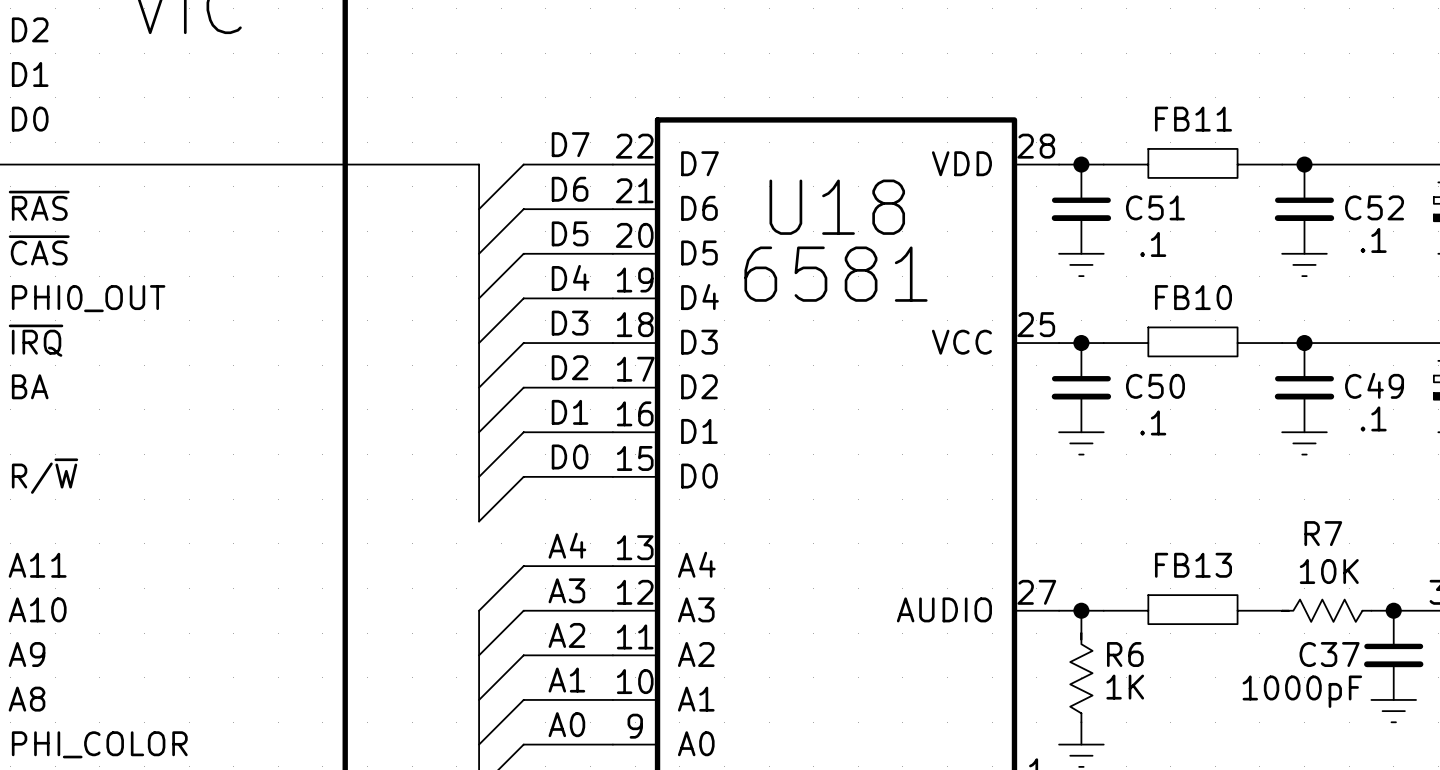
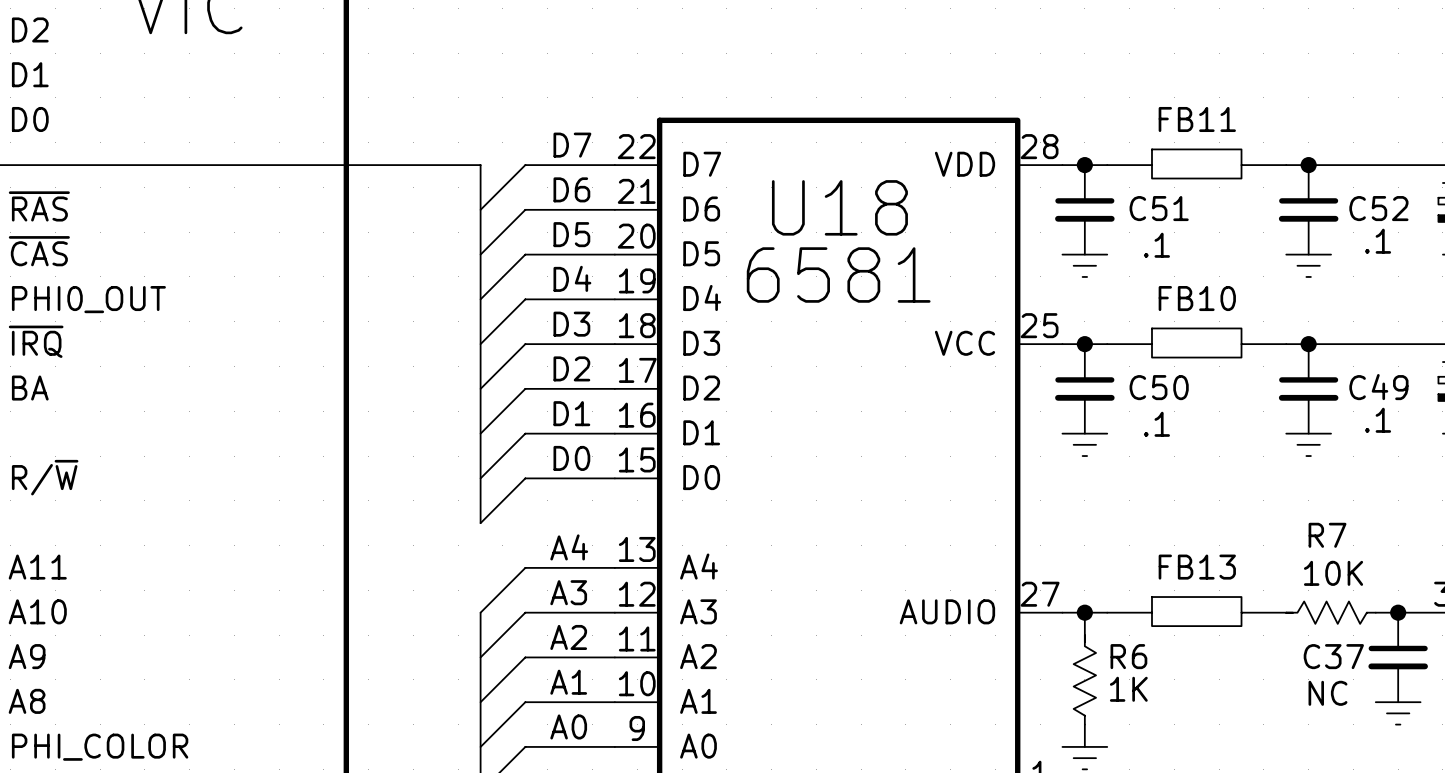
C37 value: 1000pF (1302, 691) -> NC (1327, 693)

